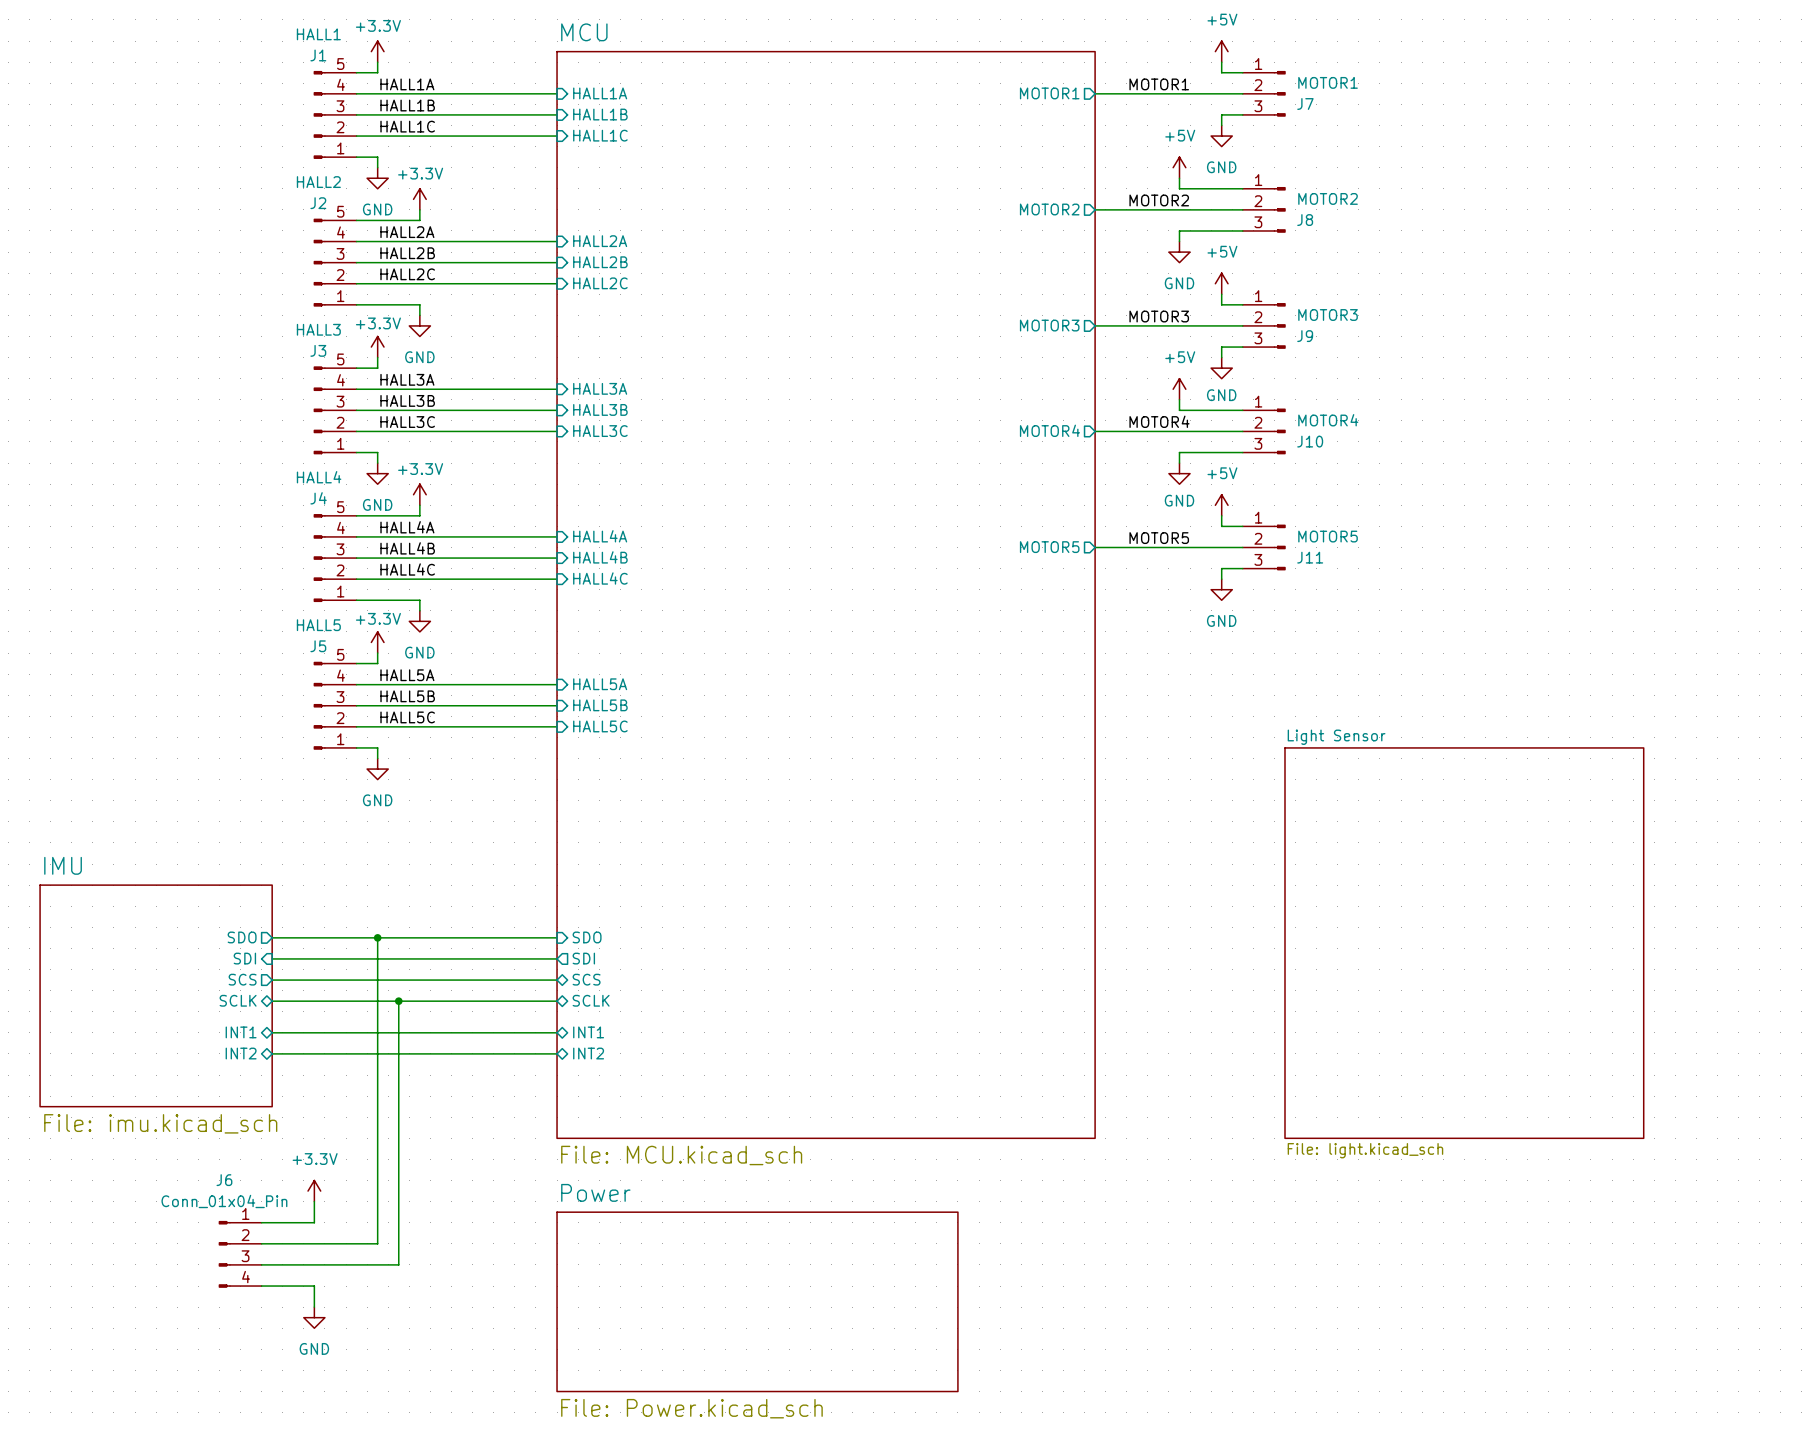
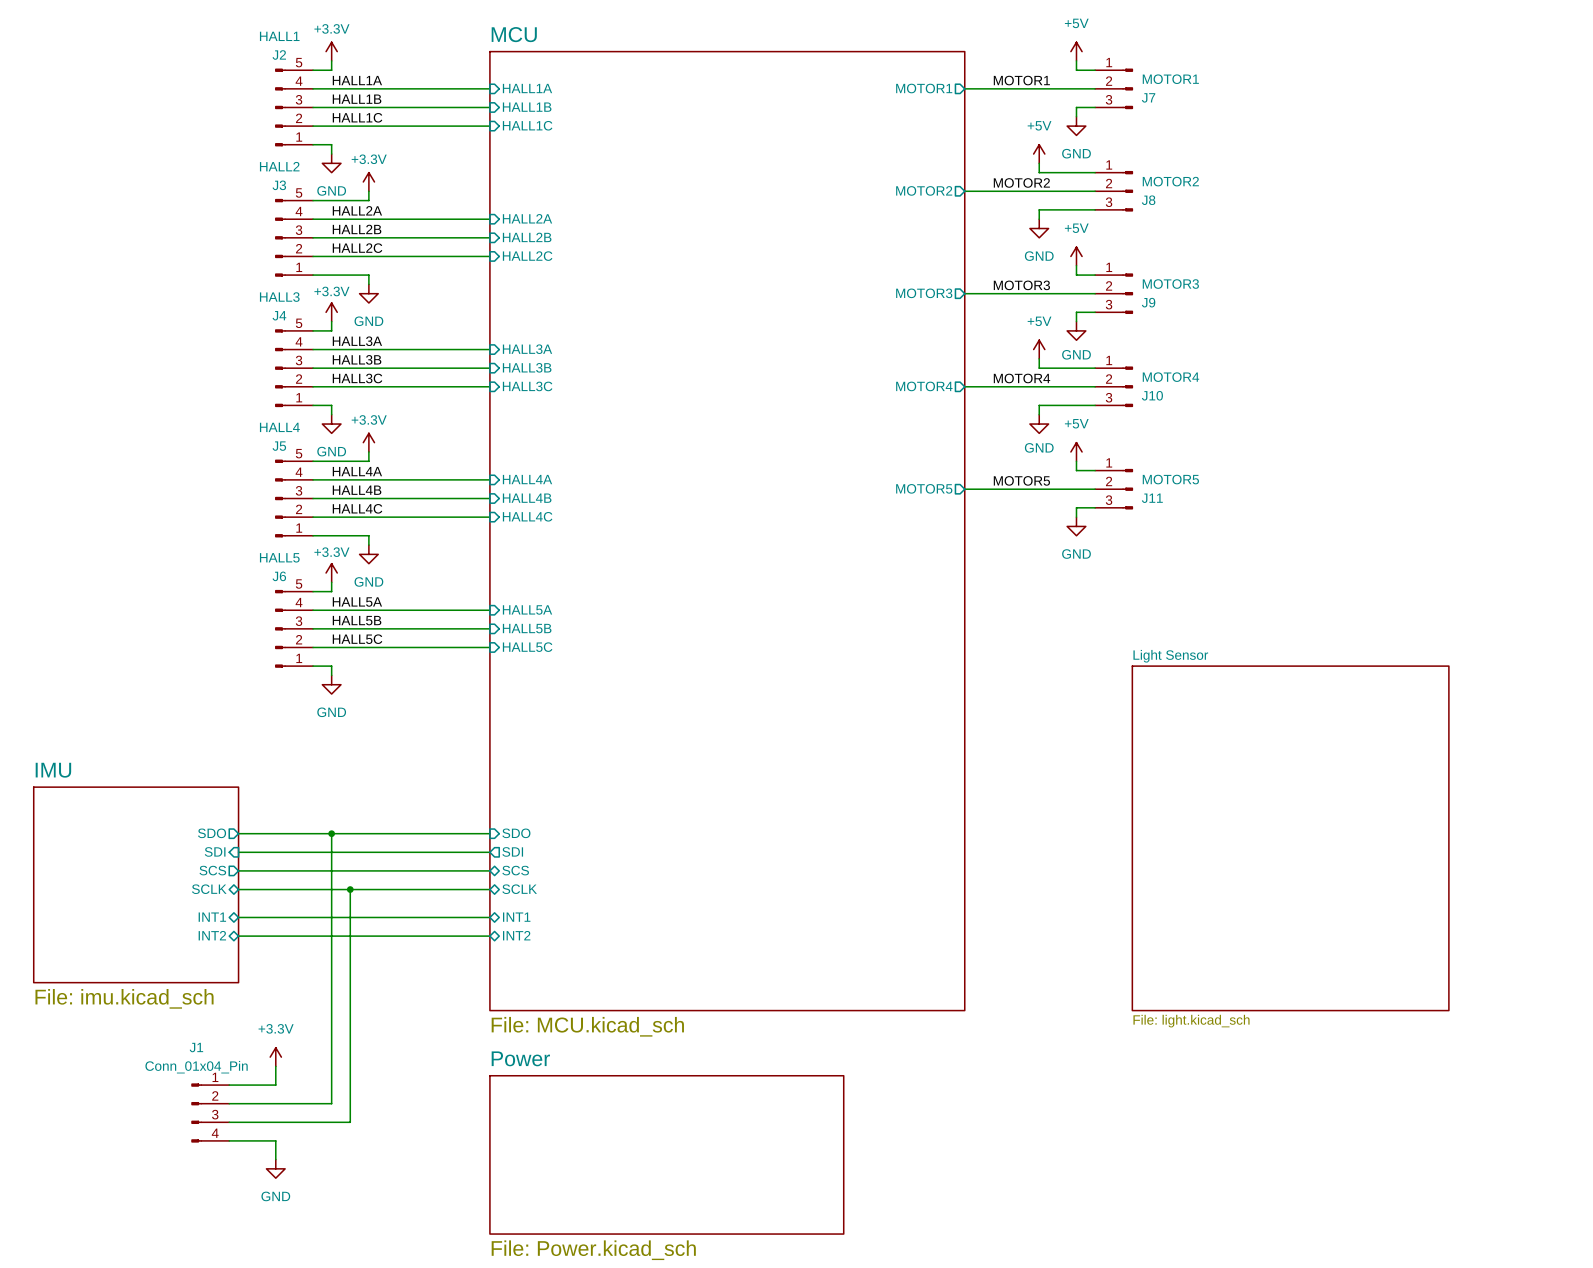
J1 name: J1 (318, 55) -> J2 (279, 54)
J2 name: J2 (318, 203) -> J3 (279, 185)
J3 name: J3 (318, 350) -> J4 (279, 315)
J4 name: J4 (318, 498) -> J5 (279, 446)
J5 name: J5 (318, 646) -> J6 (279, 576)
J6 name: J6 (224, 1180) -> J1 (196, 1047)

